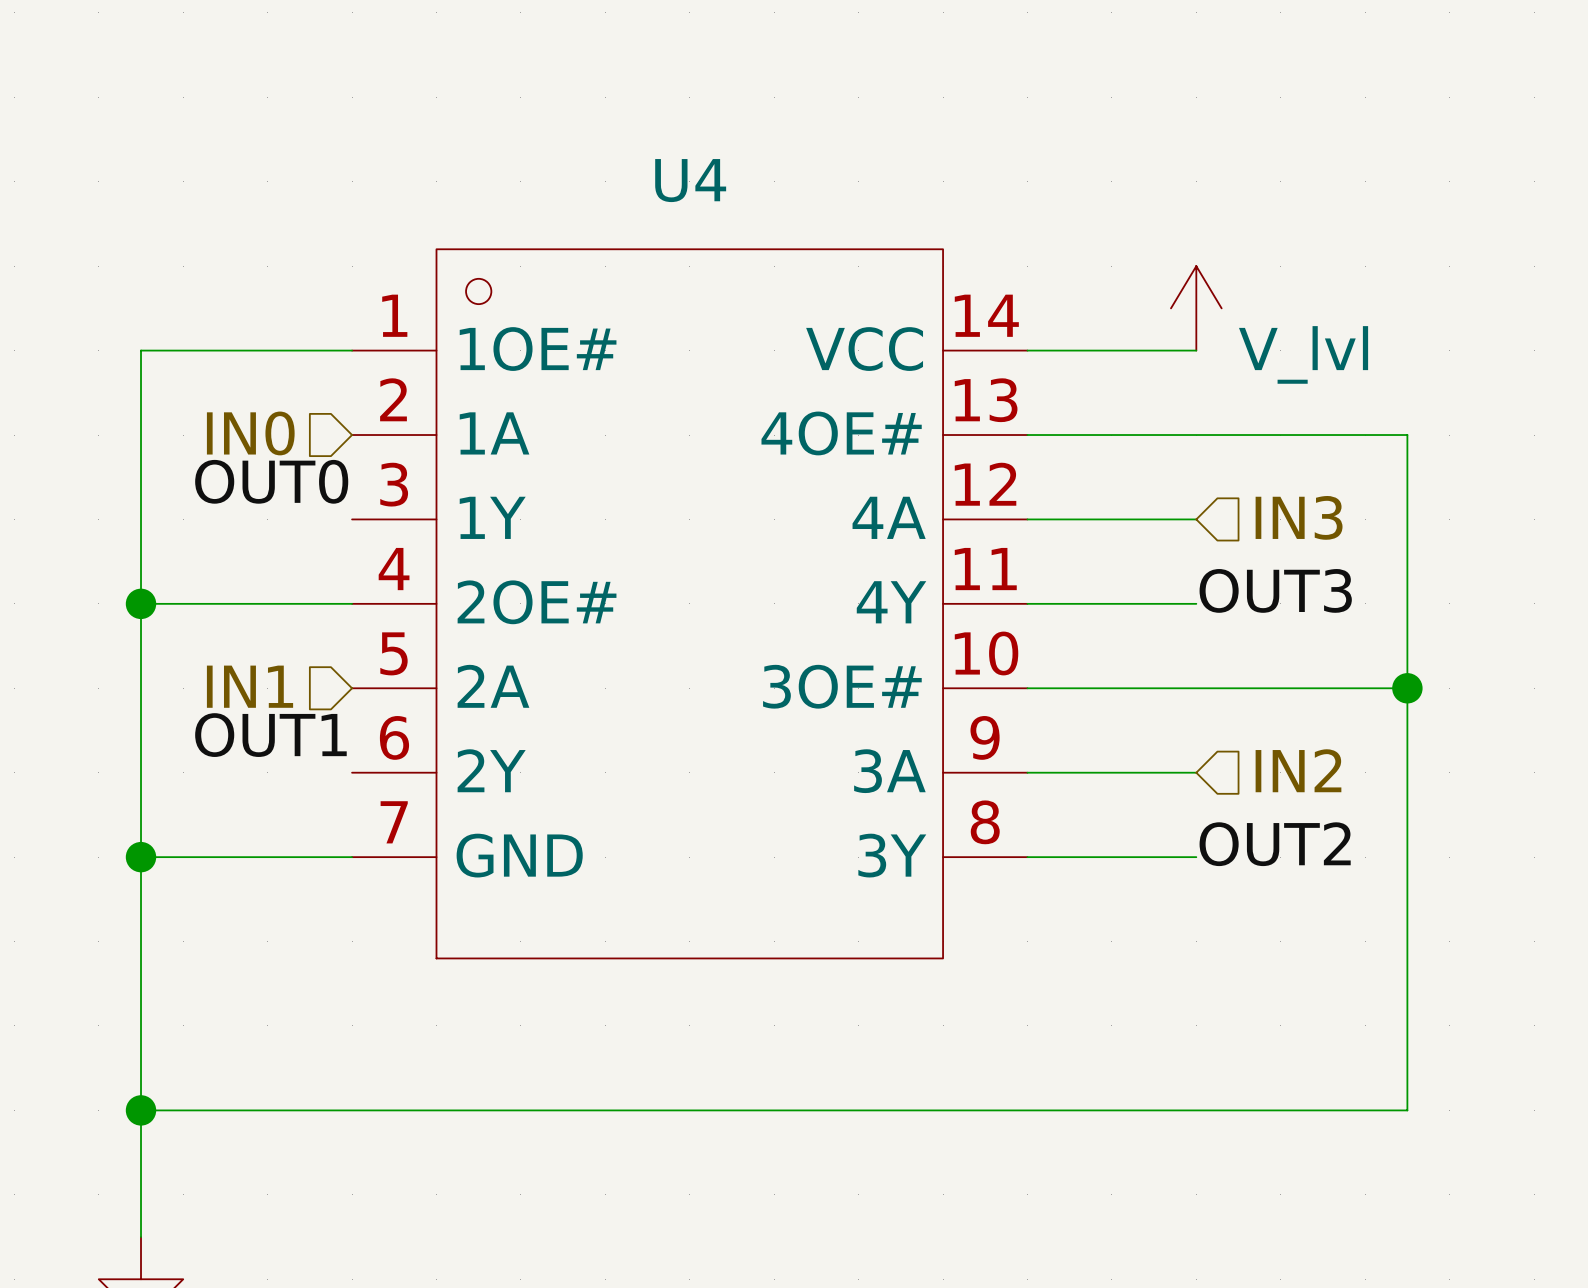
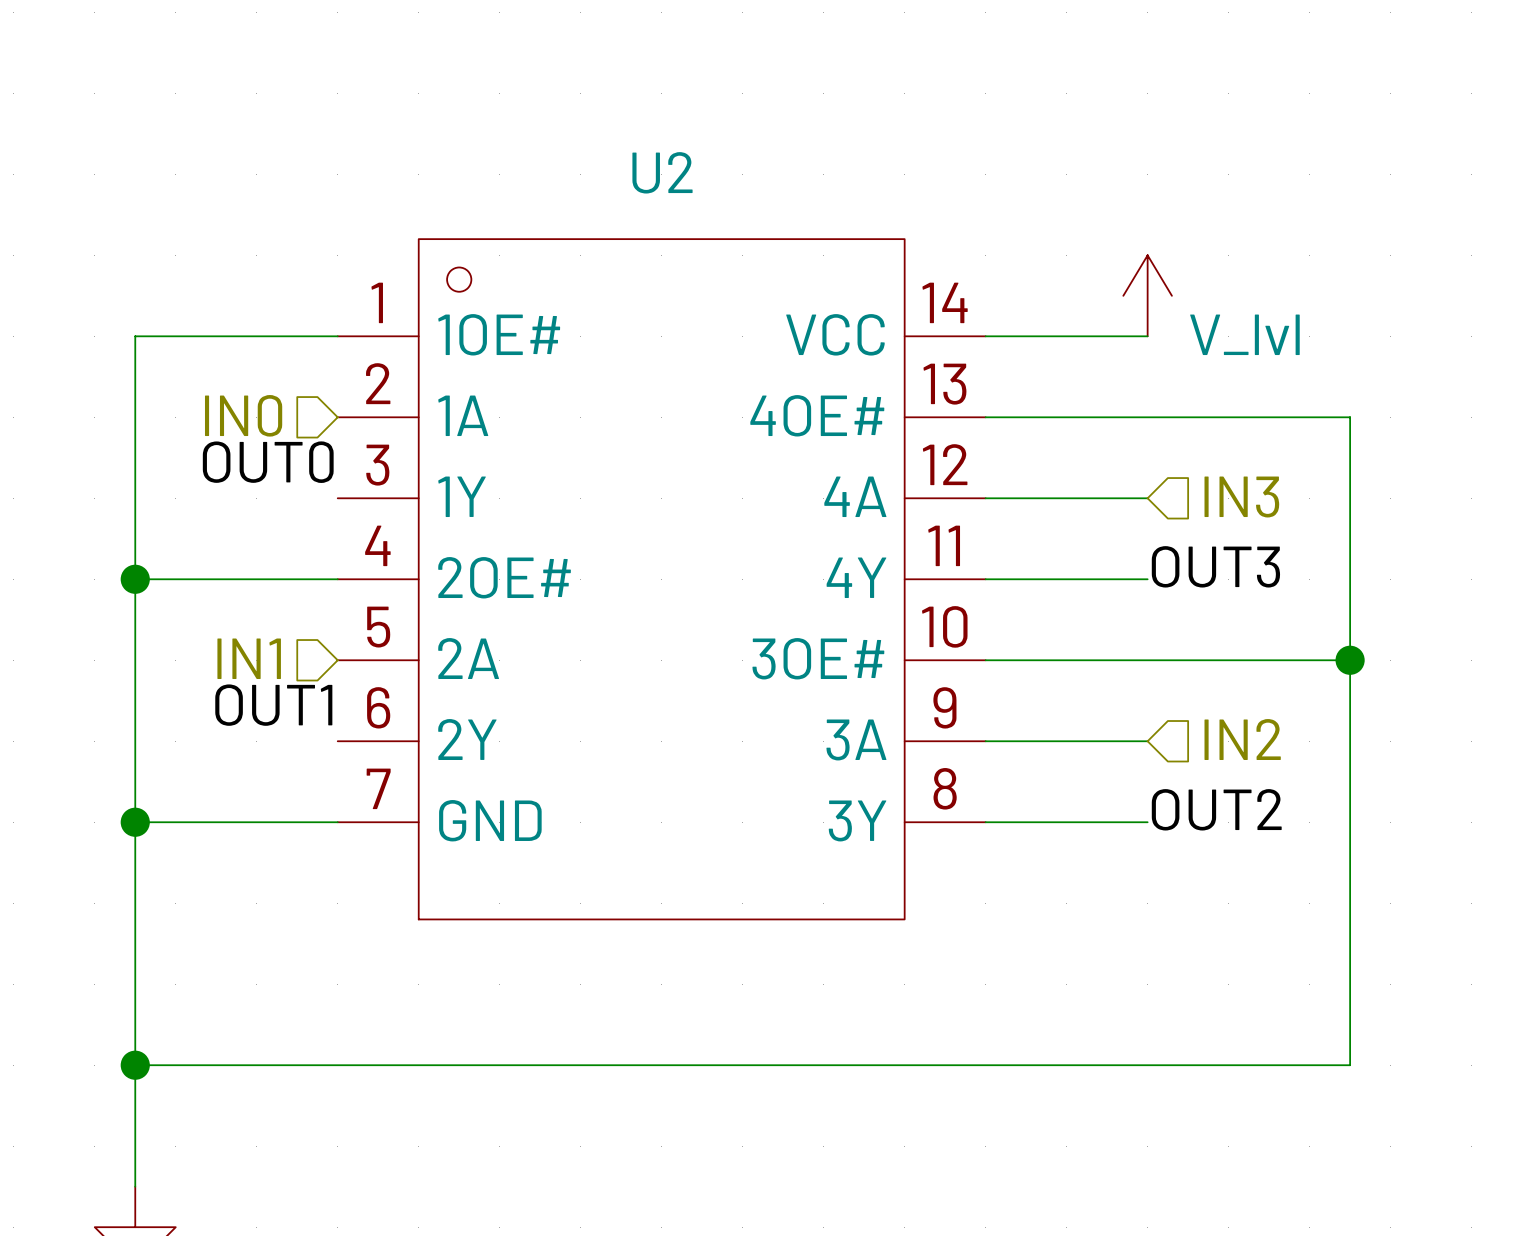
U4 name: U4 (690, 180) -> U2 (662, 172)

